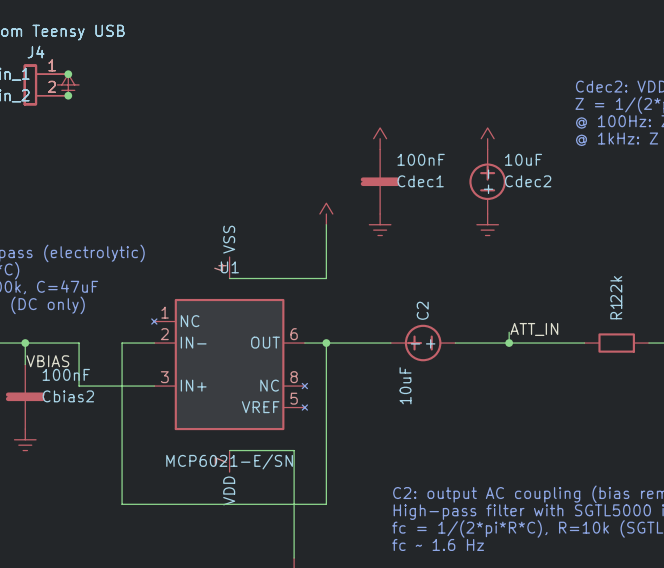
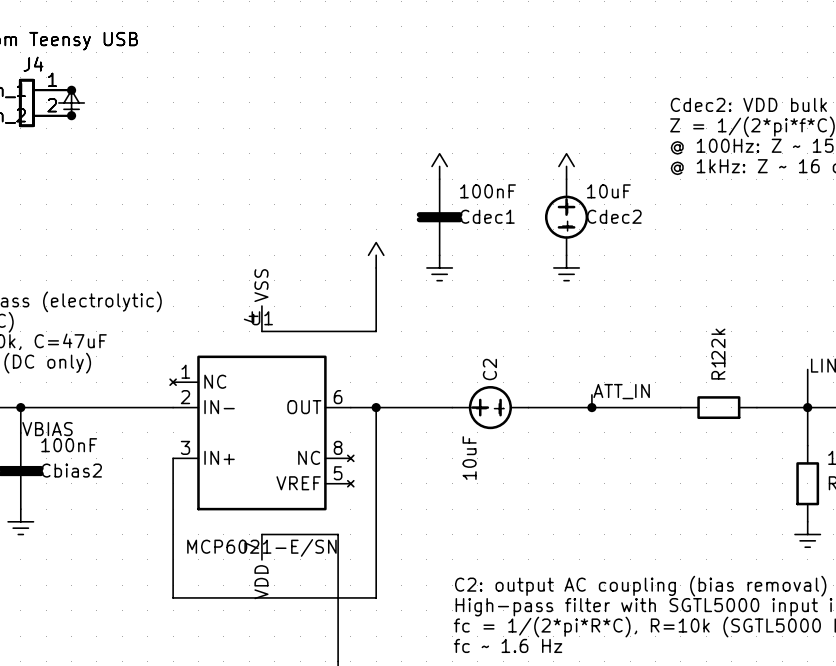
wire: (79, 343) (79, 386) (154, 386) -> (84, 407) (135, 407)
wire: (122, 343) (122, 504) (154, 504) -> (173, 458) (173, 597)

